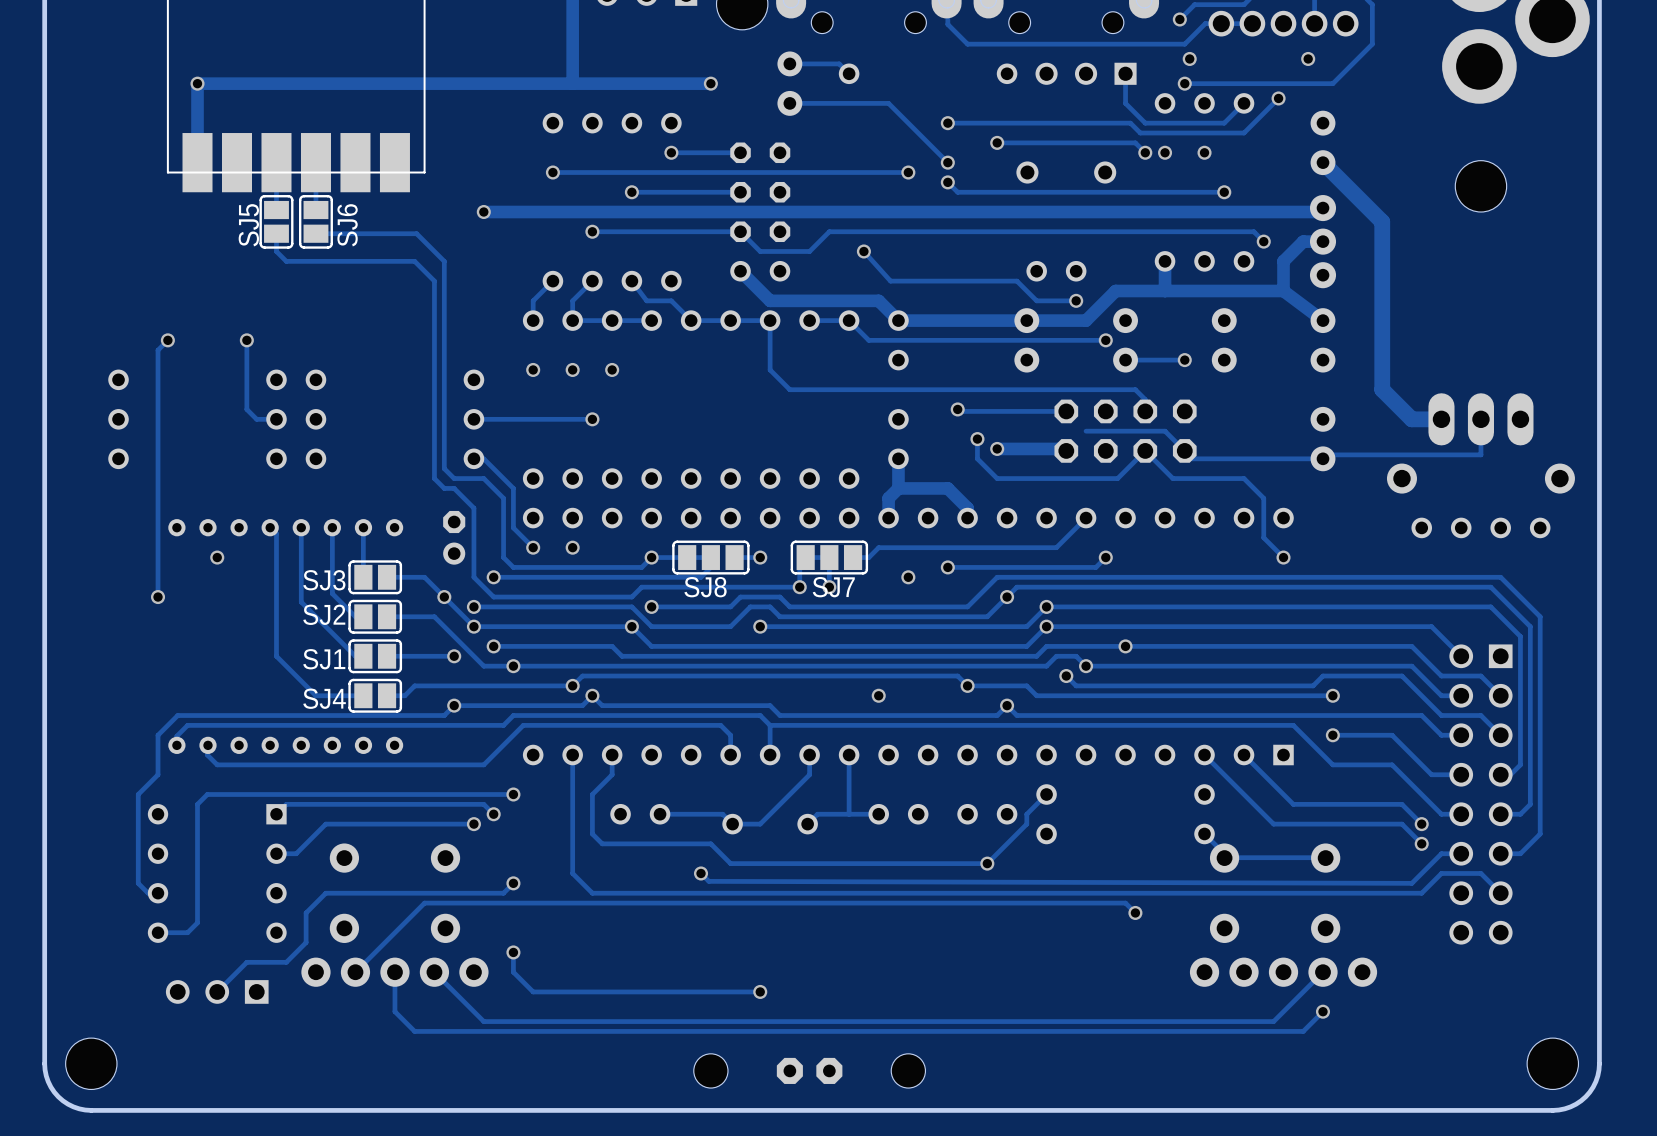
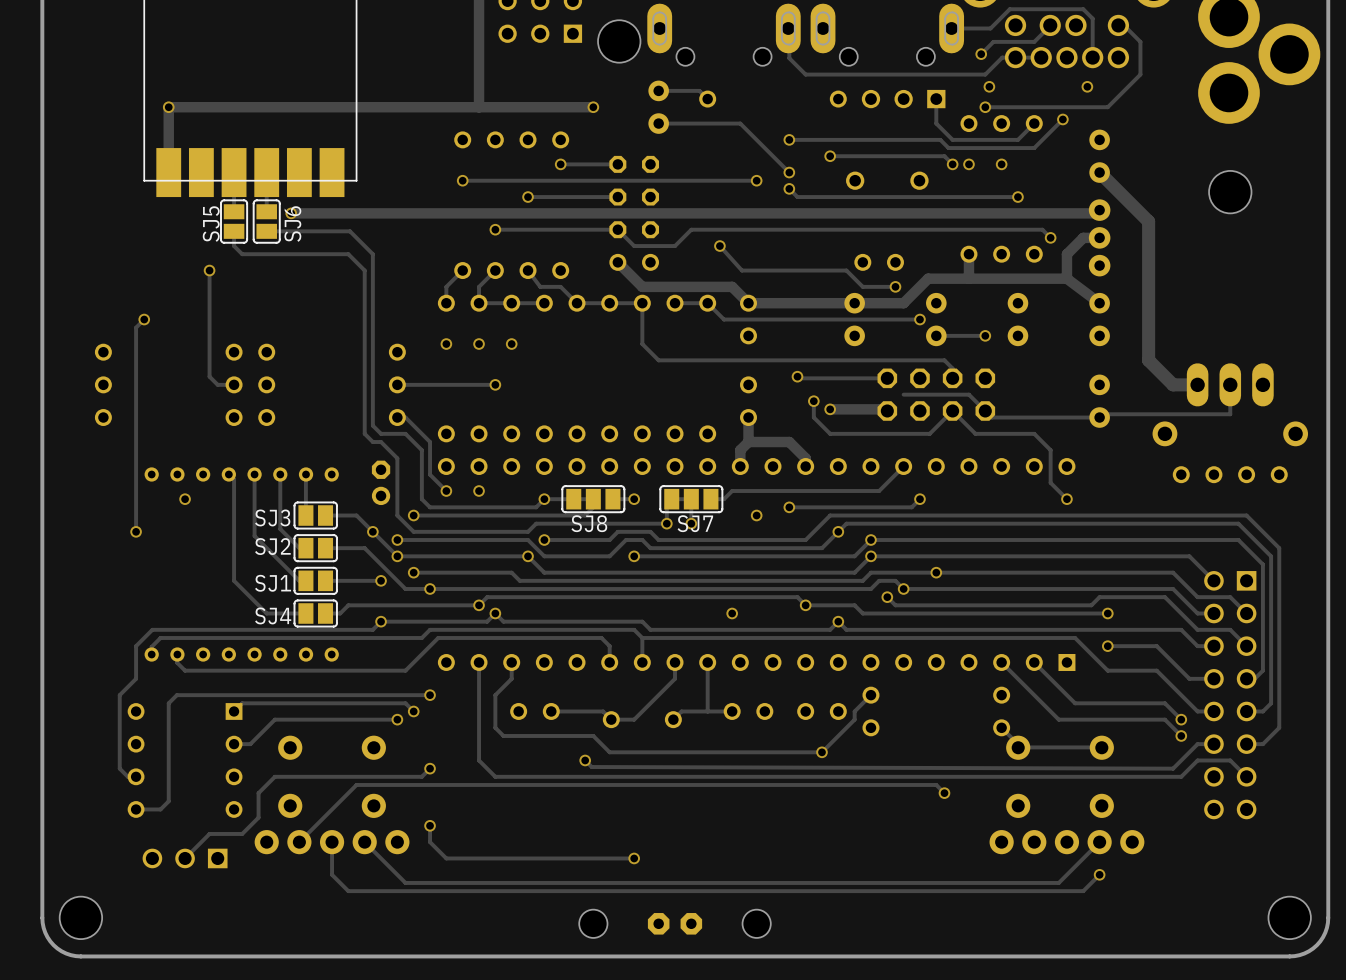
via: none -> (291, 213)
track: none -> (405, 213) (291, 213)
via: (483, 212) -> none
track: none -> (209, 270) (209, 319)
via position: (246, 340) -> (209, 270)

